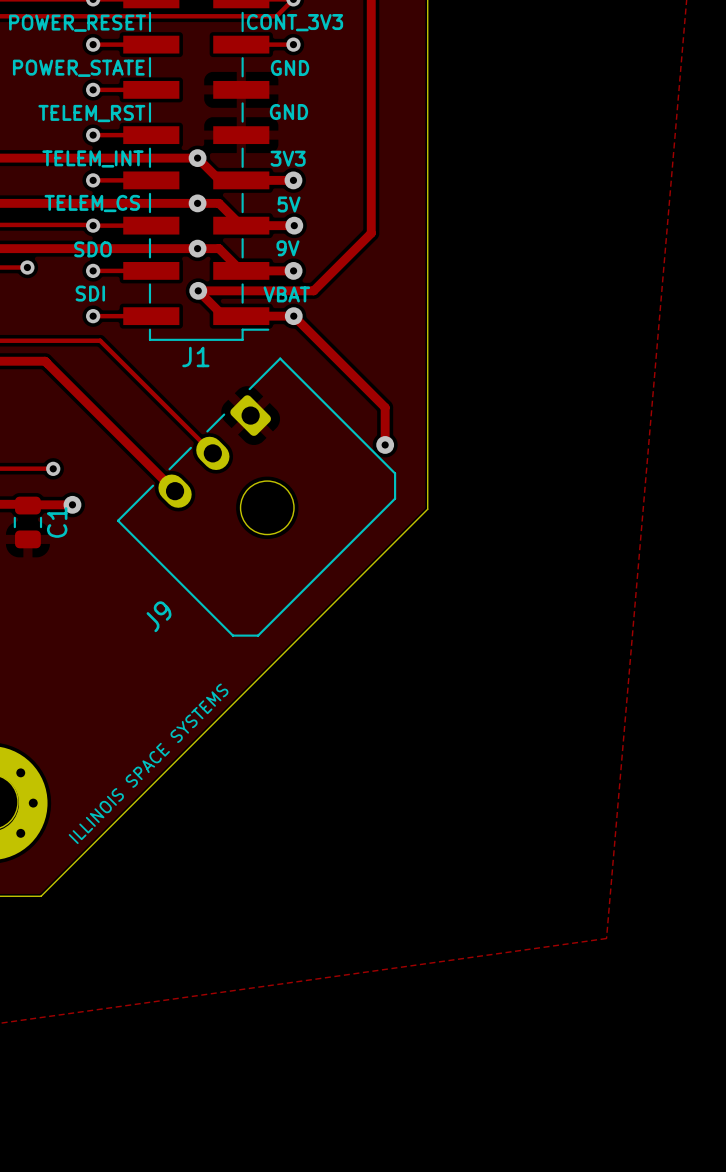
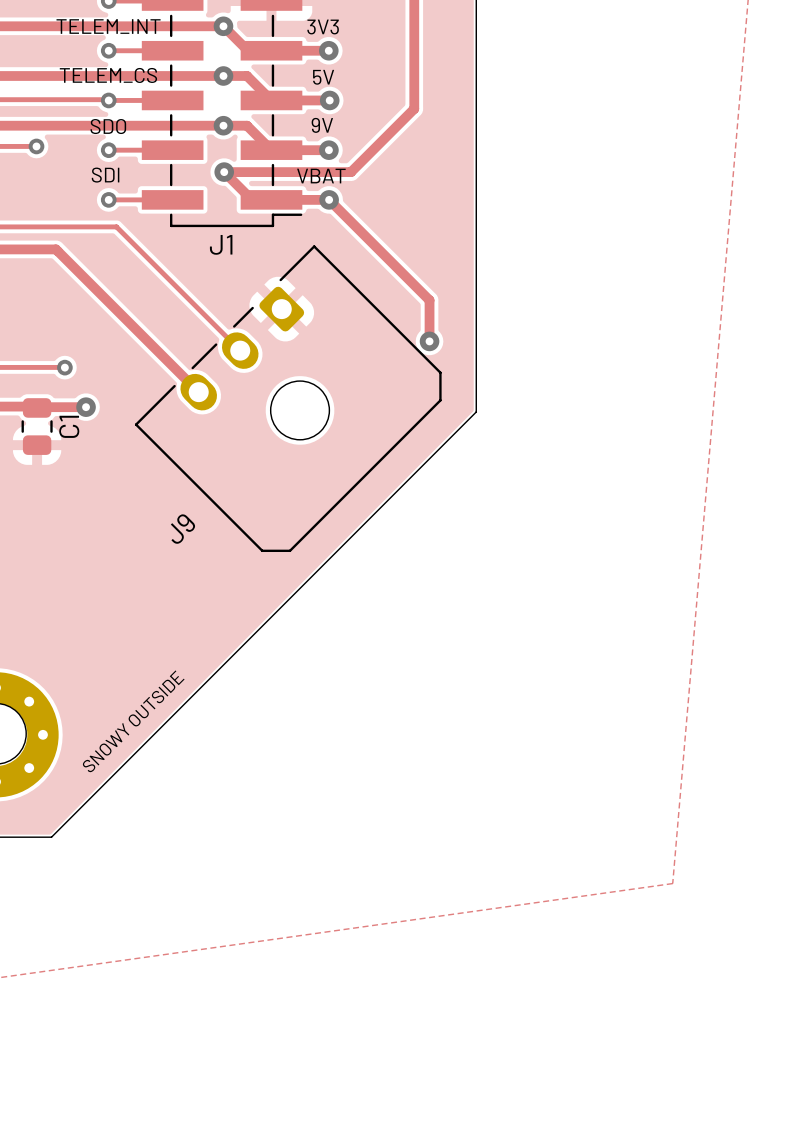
text: ILLINOIS SPACE SYSTEMS (148, 763) -> none
text: none -> SNOWY OUTSIDE (133, 721)

